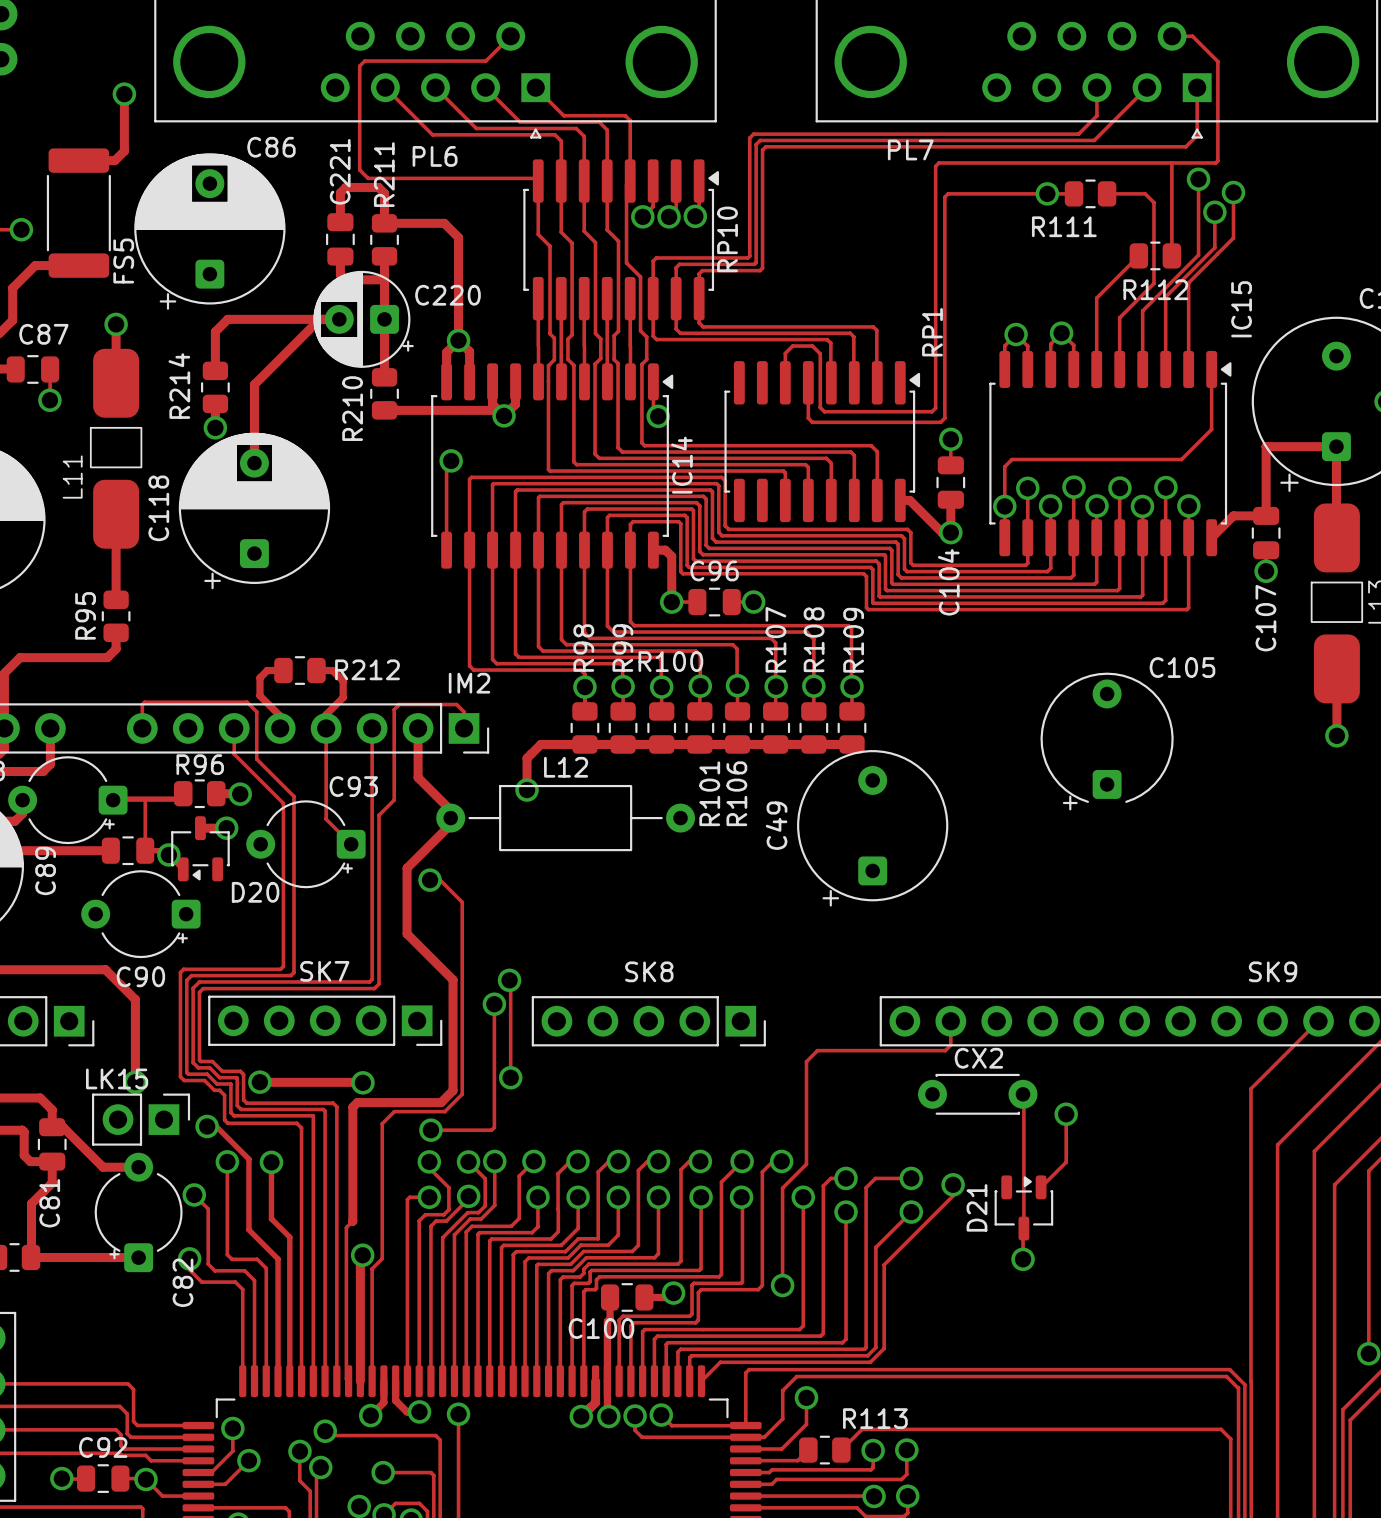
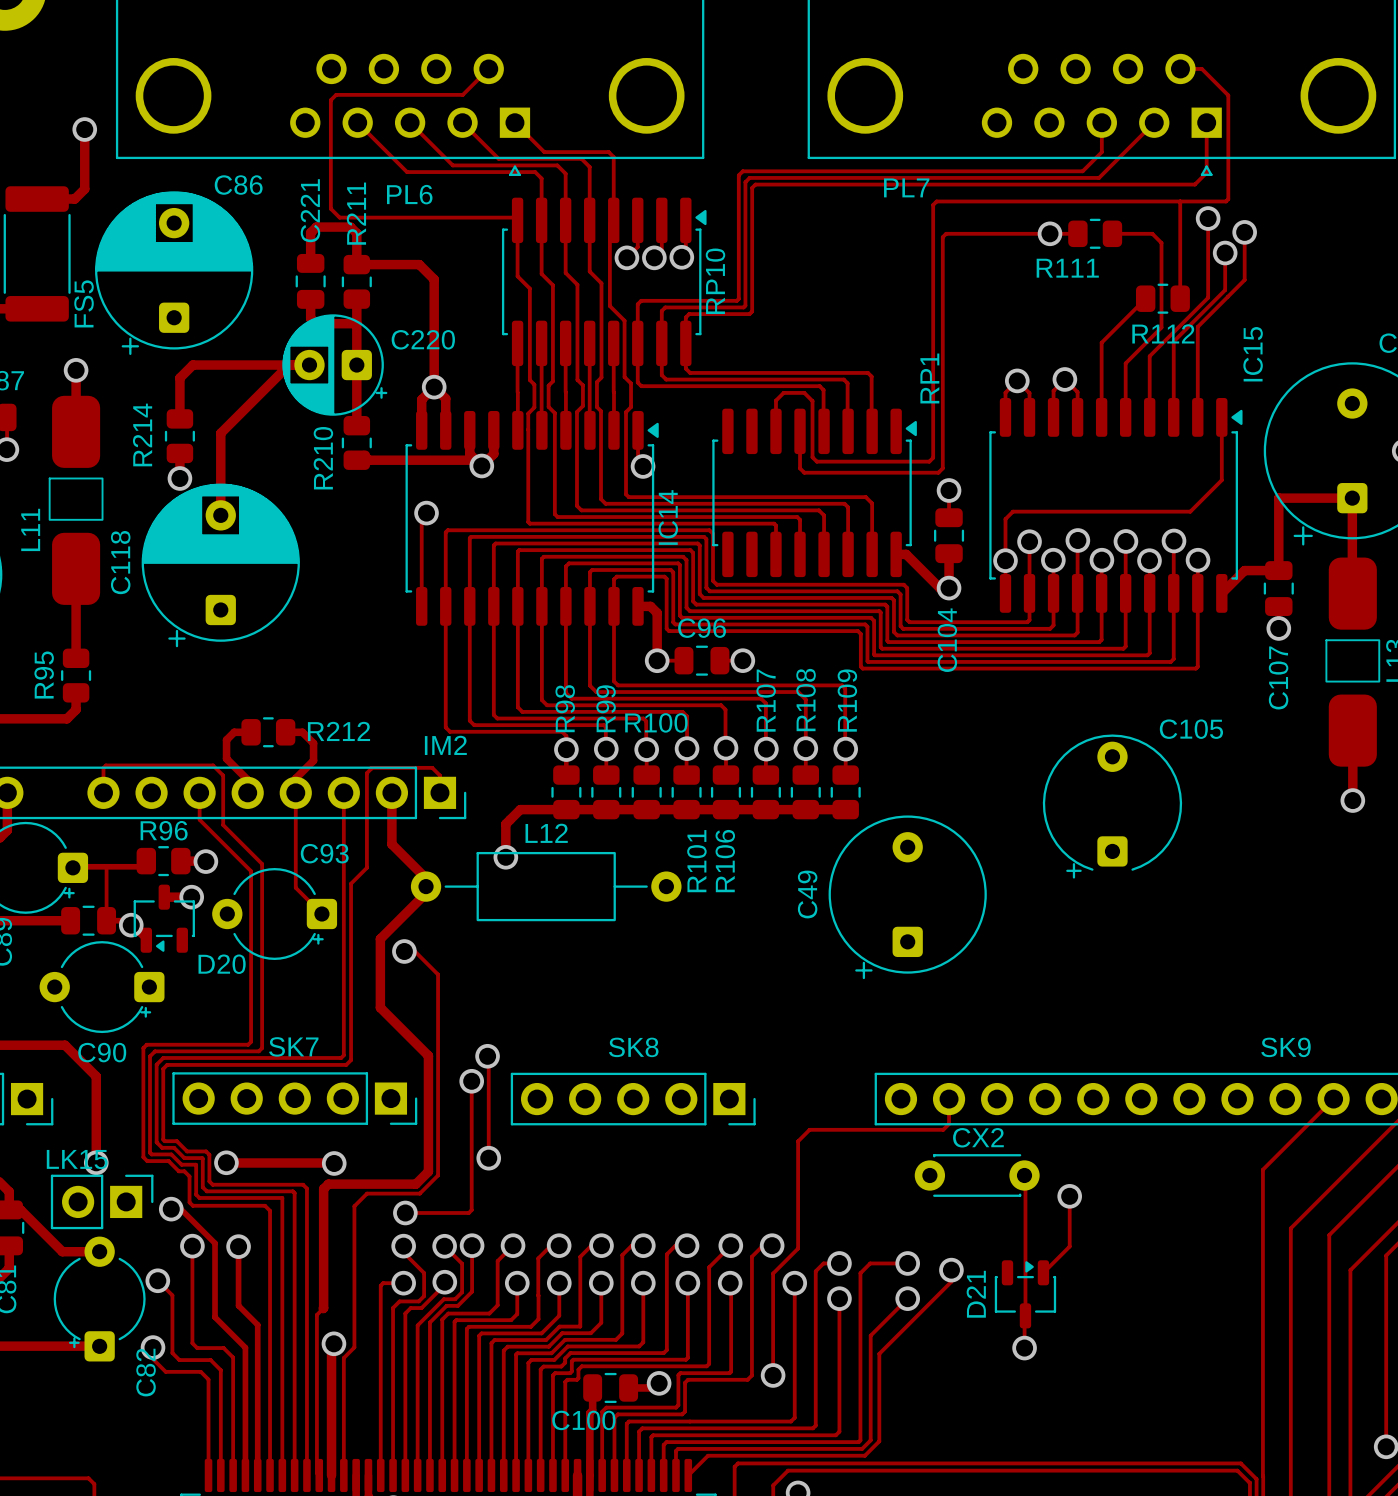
C49 position: (872, 828) -> (907, 897)

